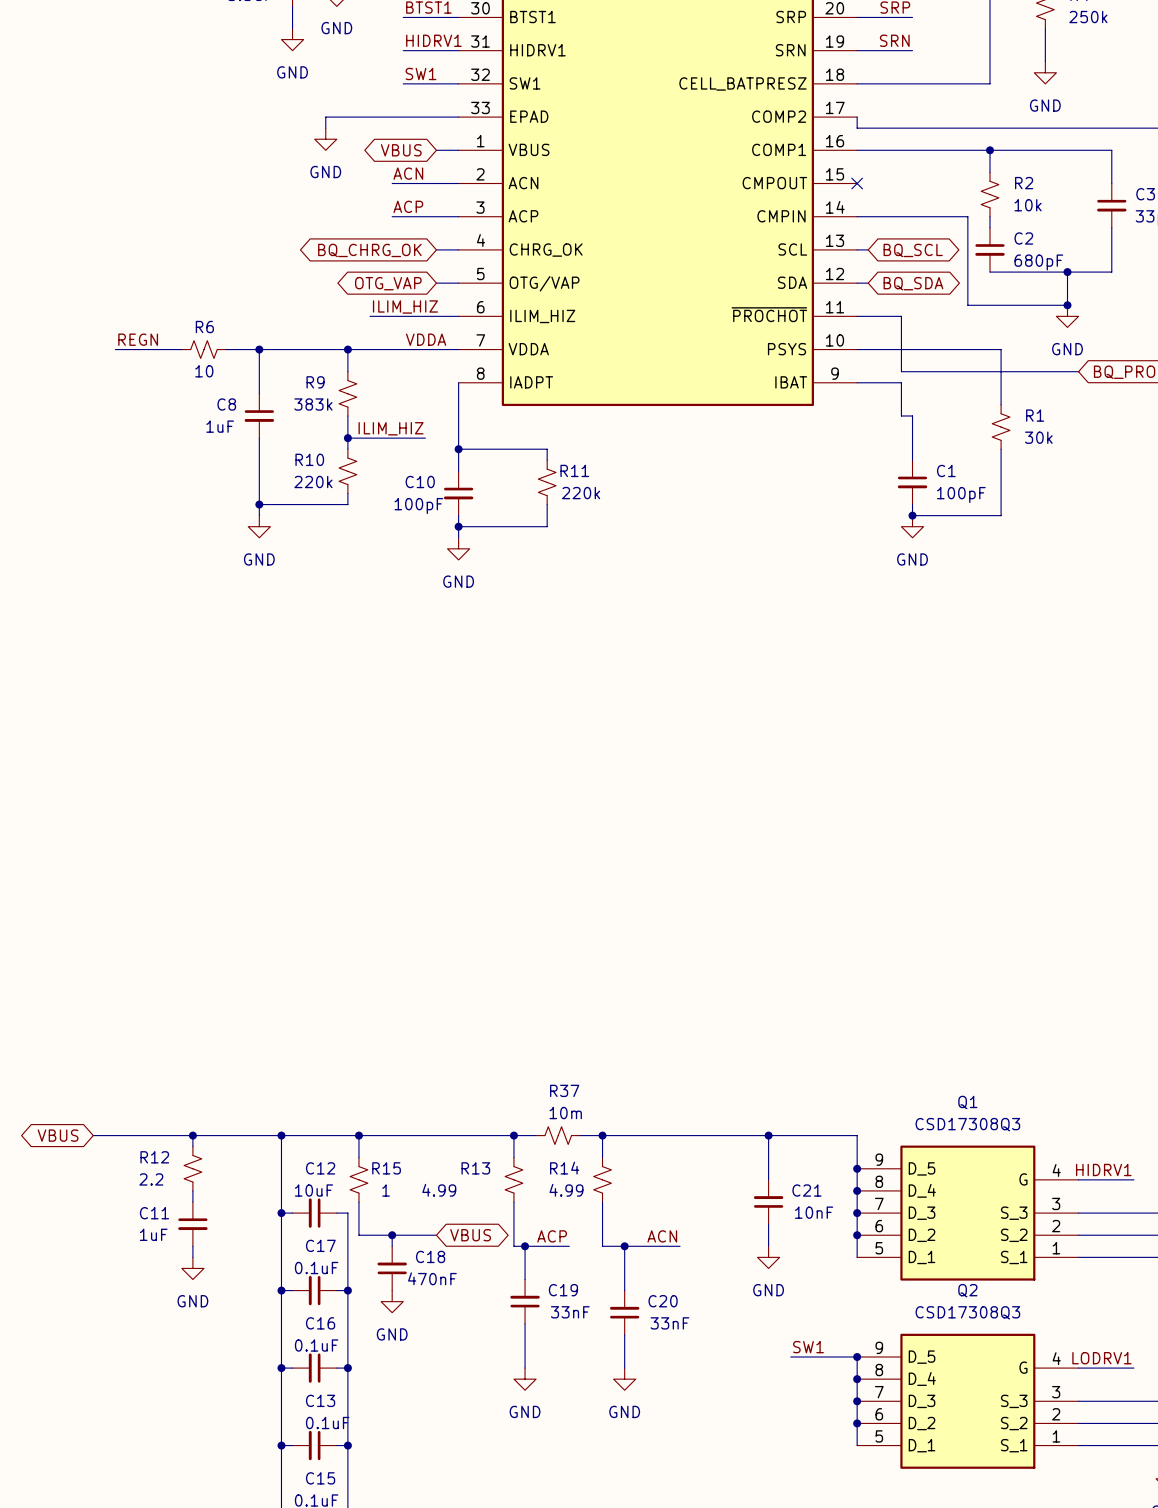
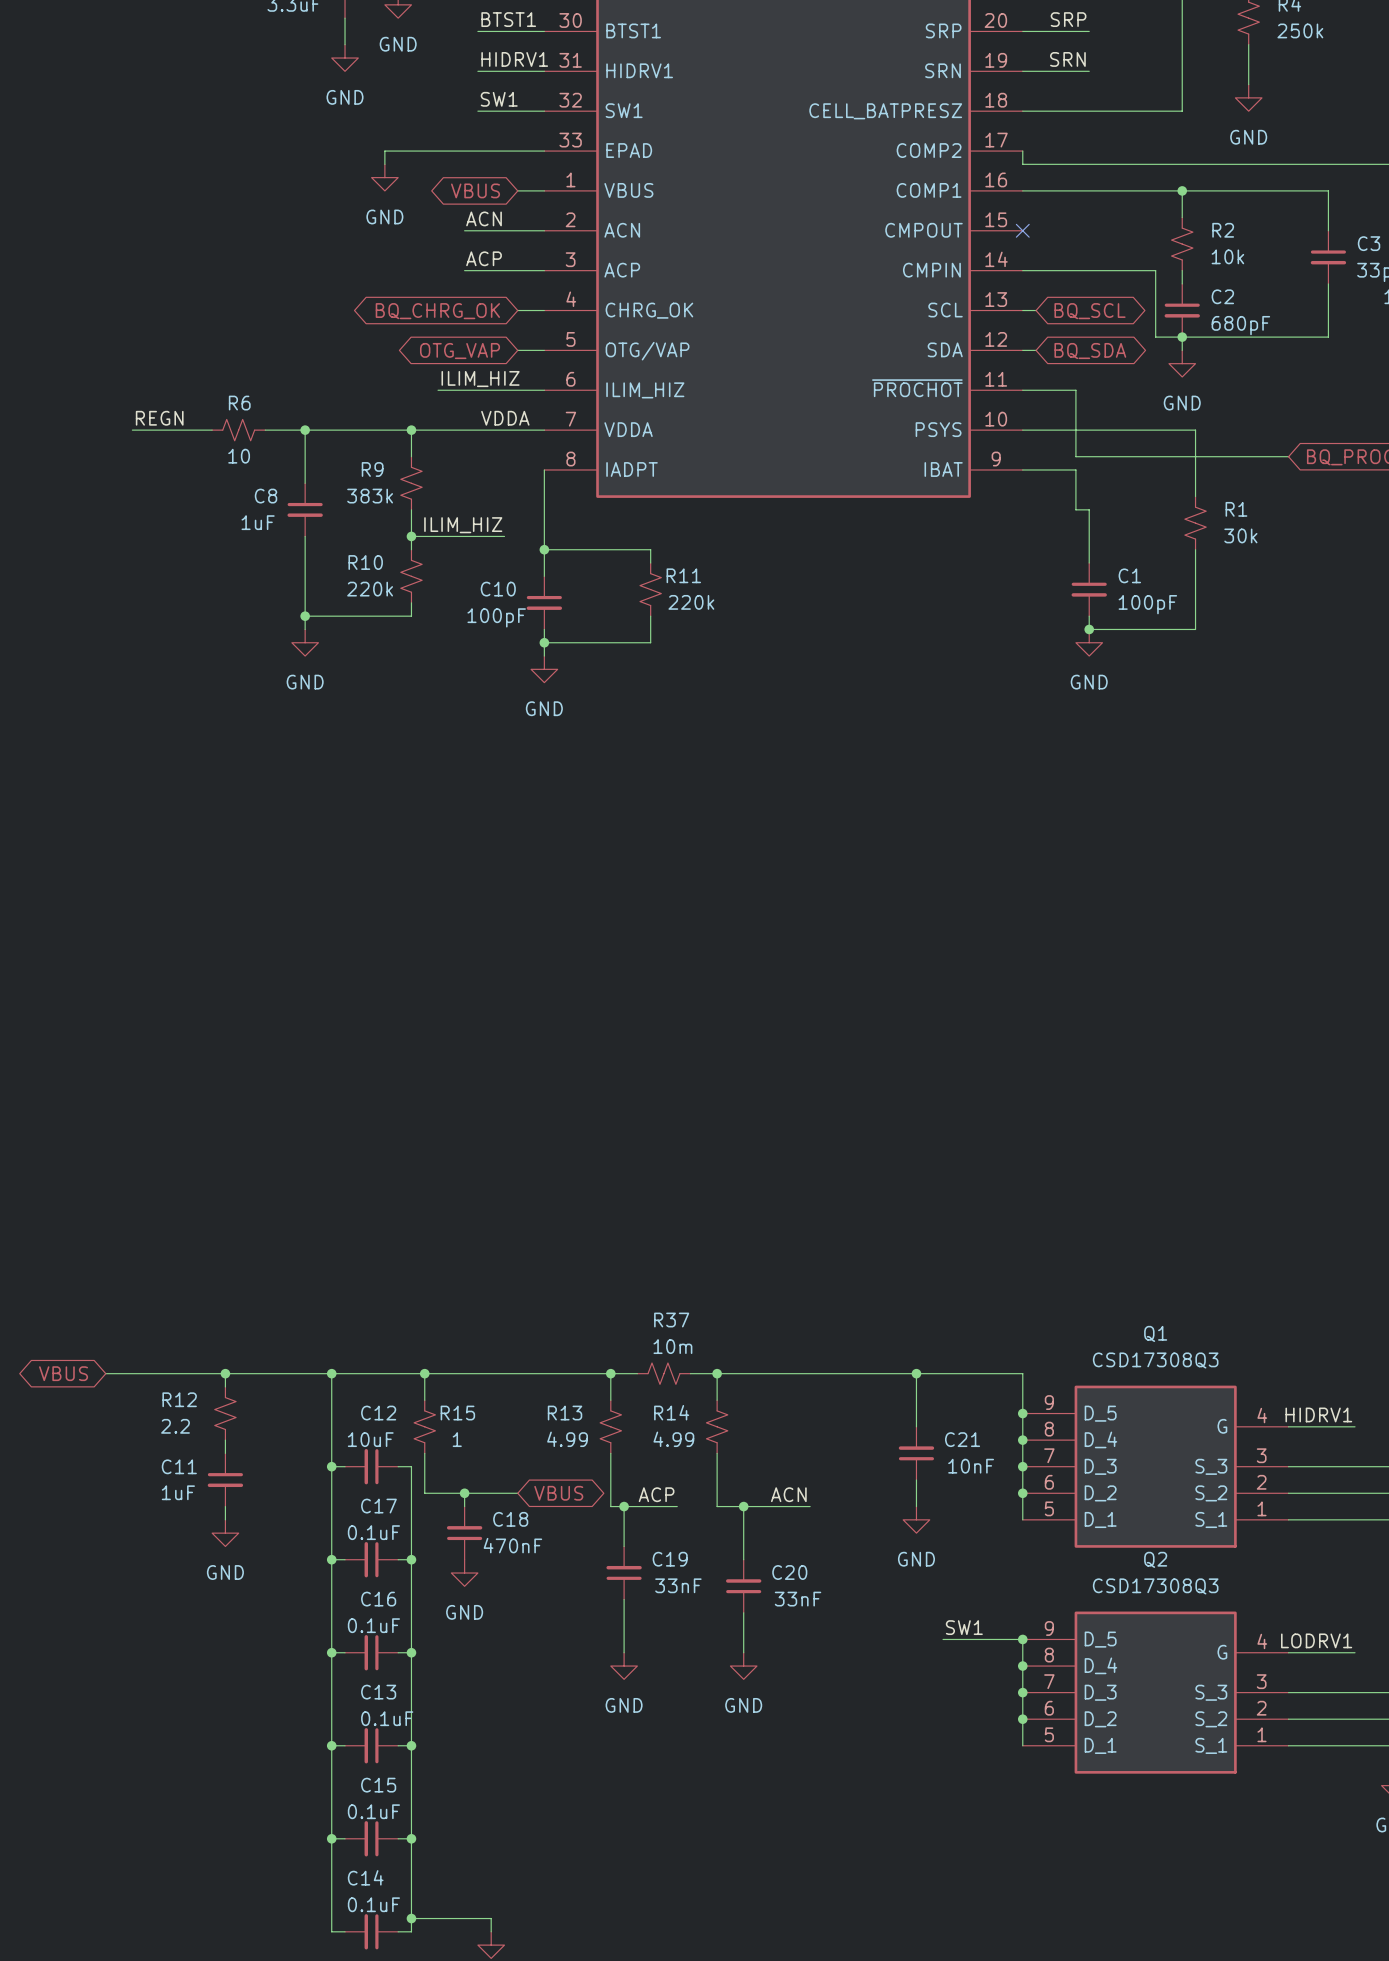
wire: (967, 272) (967, 305) (1067, 305) (1067, 272) -> (1155, 337) (1182, 337) (1182, 350)
junction: none -> (1182, 337)
junction: (1067, 272) -> none
junction: (1067, 305) -> none
power symbol position: GND (1067, 316) -> GND (1182, 363)
R13 value position: 4.99 (439, 1190) -> 4.99 (567, 1439)

